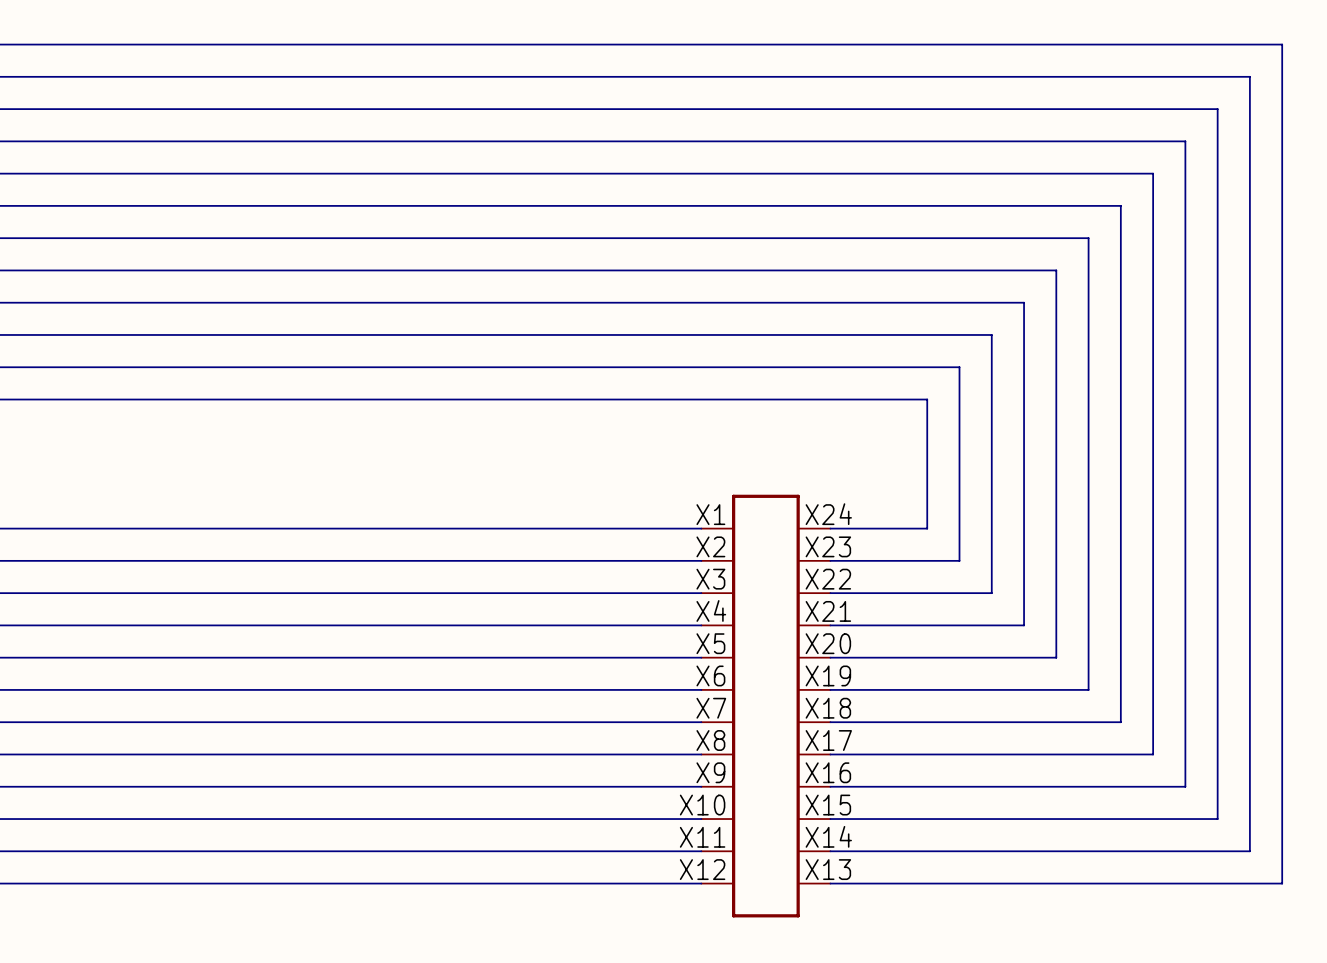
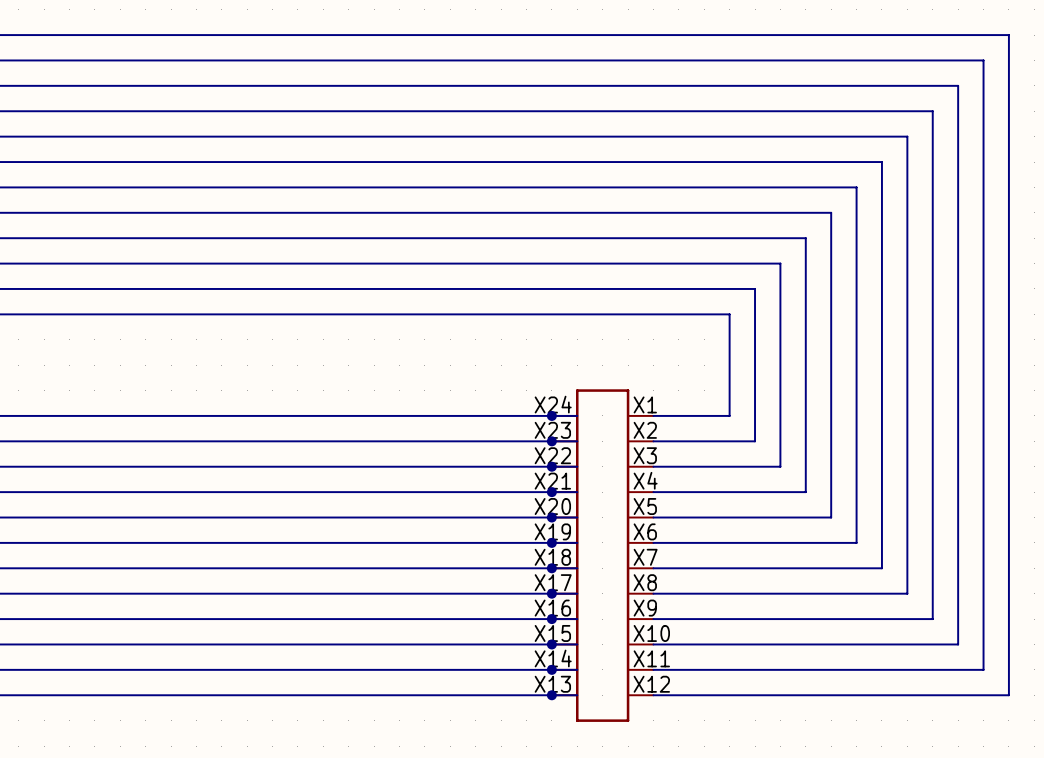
junction: none -> (551, 415)
junction: none -> (551, 441)
junction: none -> (551, 466)
junction: none -> (551, 492)
junction: none -> (551, 517)
junction: none -> (551, 542)
part flip: as is (765, 706) -> left-right (602, 555)
junction: none -> (551, 568)
junction: none -> (551, 593)
junction: none -> (551, 619)
junction: none -> (551, 644)
junction: none -> (551, 669)
junction: none -> (551, 695)

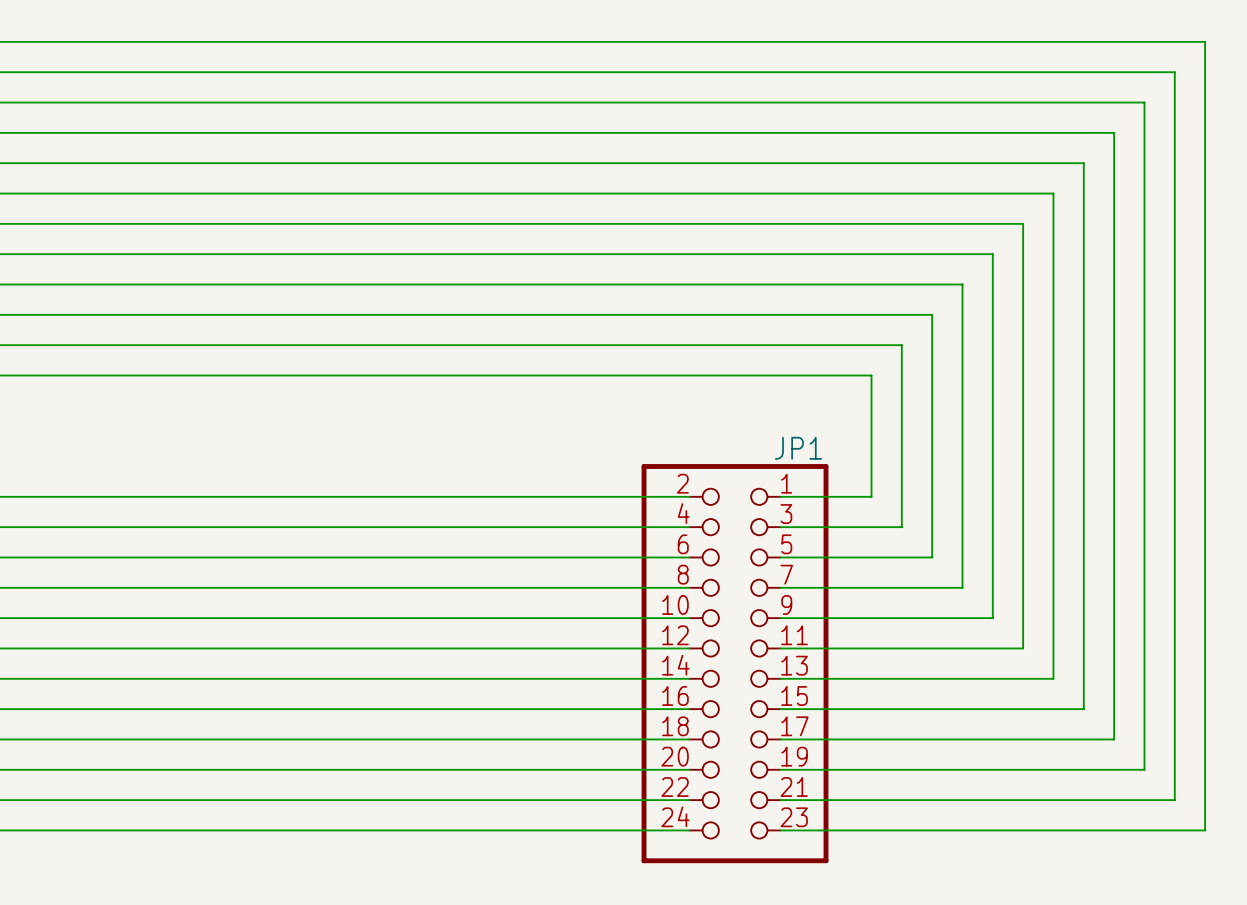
junction: (551, 415) -> none
junction: (551, 441) -> none
junction: (551, 466) -> none
junction: (551, 492) -> none
junction: (551, 517) -> none
junction: (551, 542) -> none
part: (602, 555) -> none
JP1: none -> (735, 663)
junction: (551, 568) -> none
junction: (551, 593) -> none
junction: (551, 619) -> none
junction: (551, 644) -> none
junction: (551, 669) -> none
junction: (551, 695) -> none

